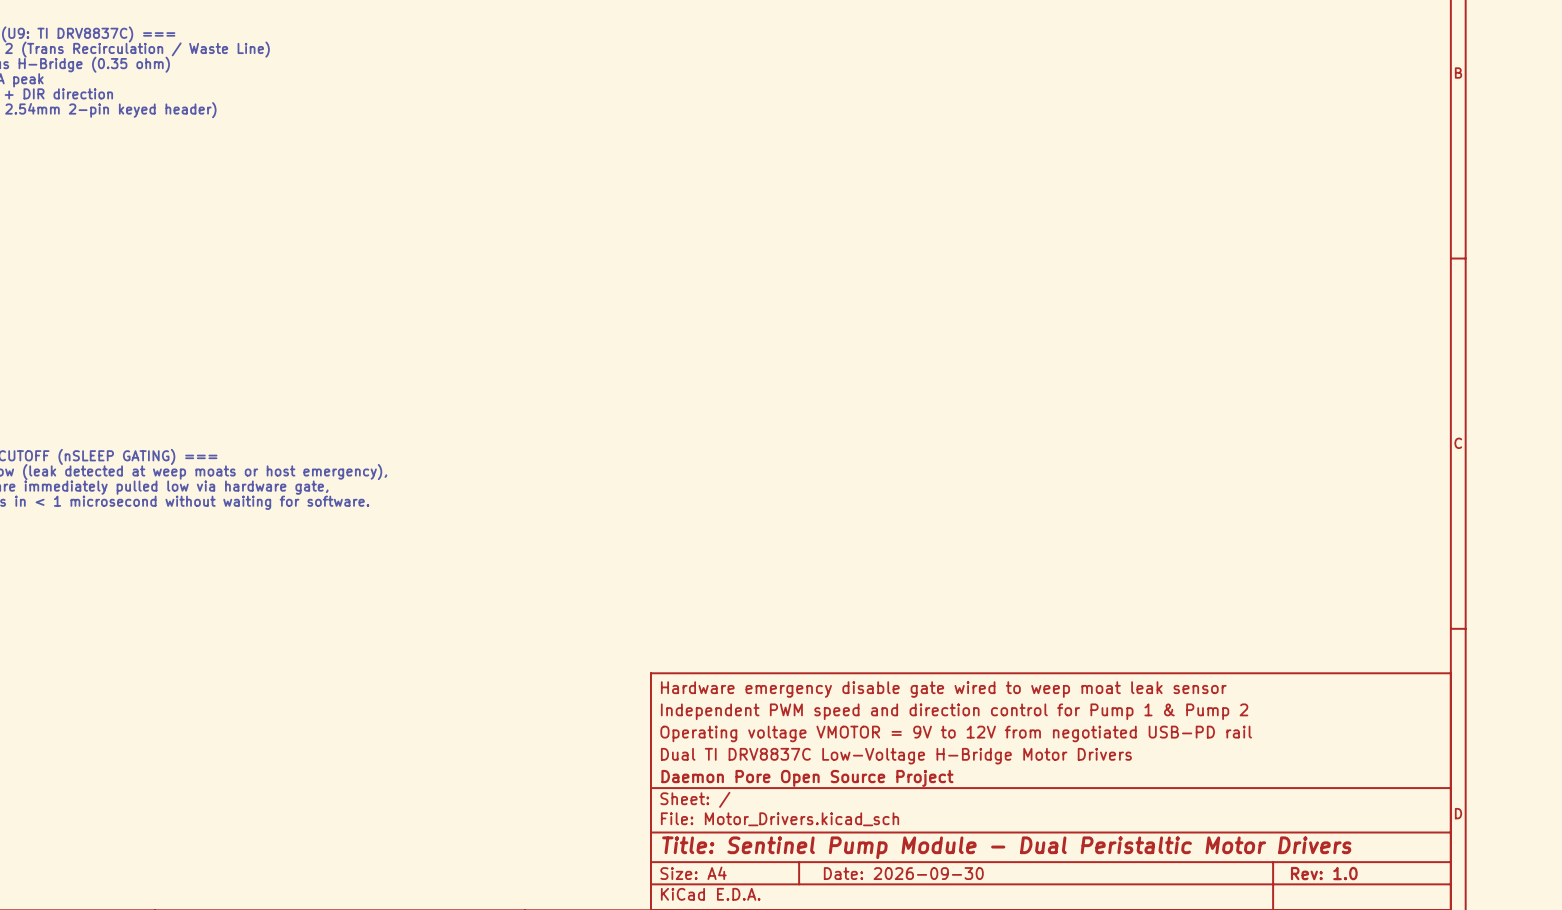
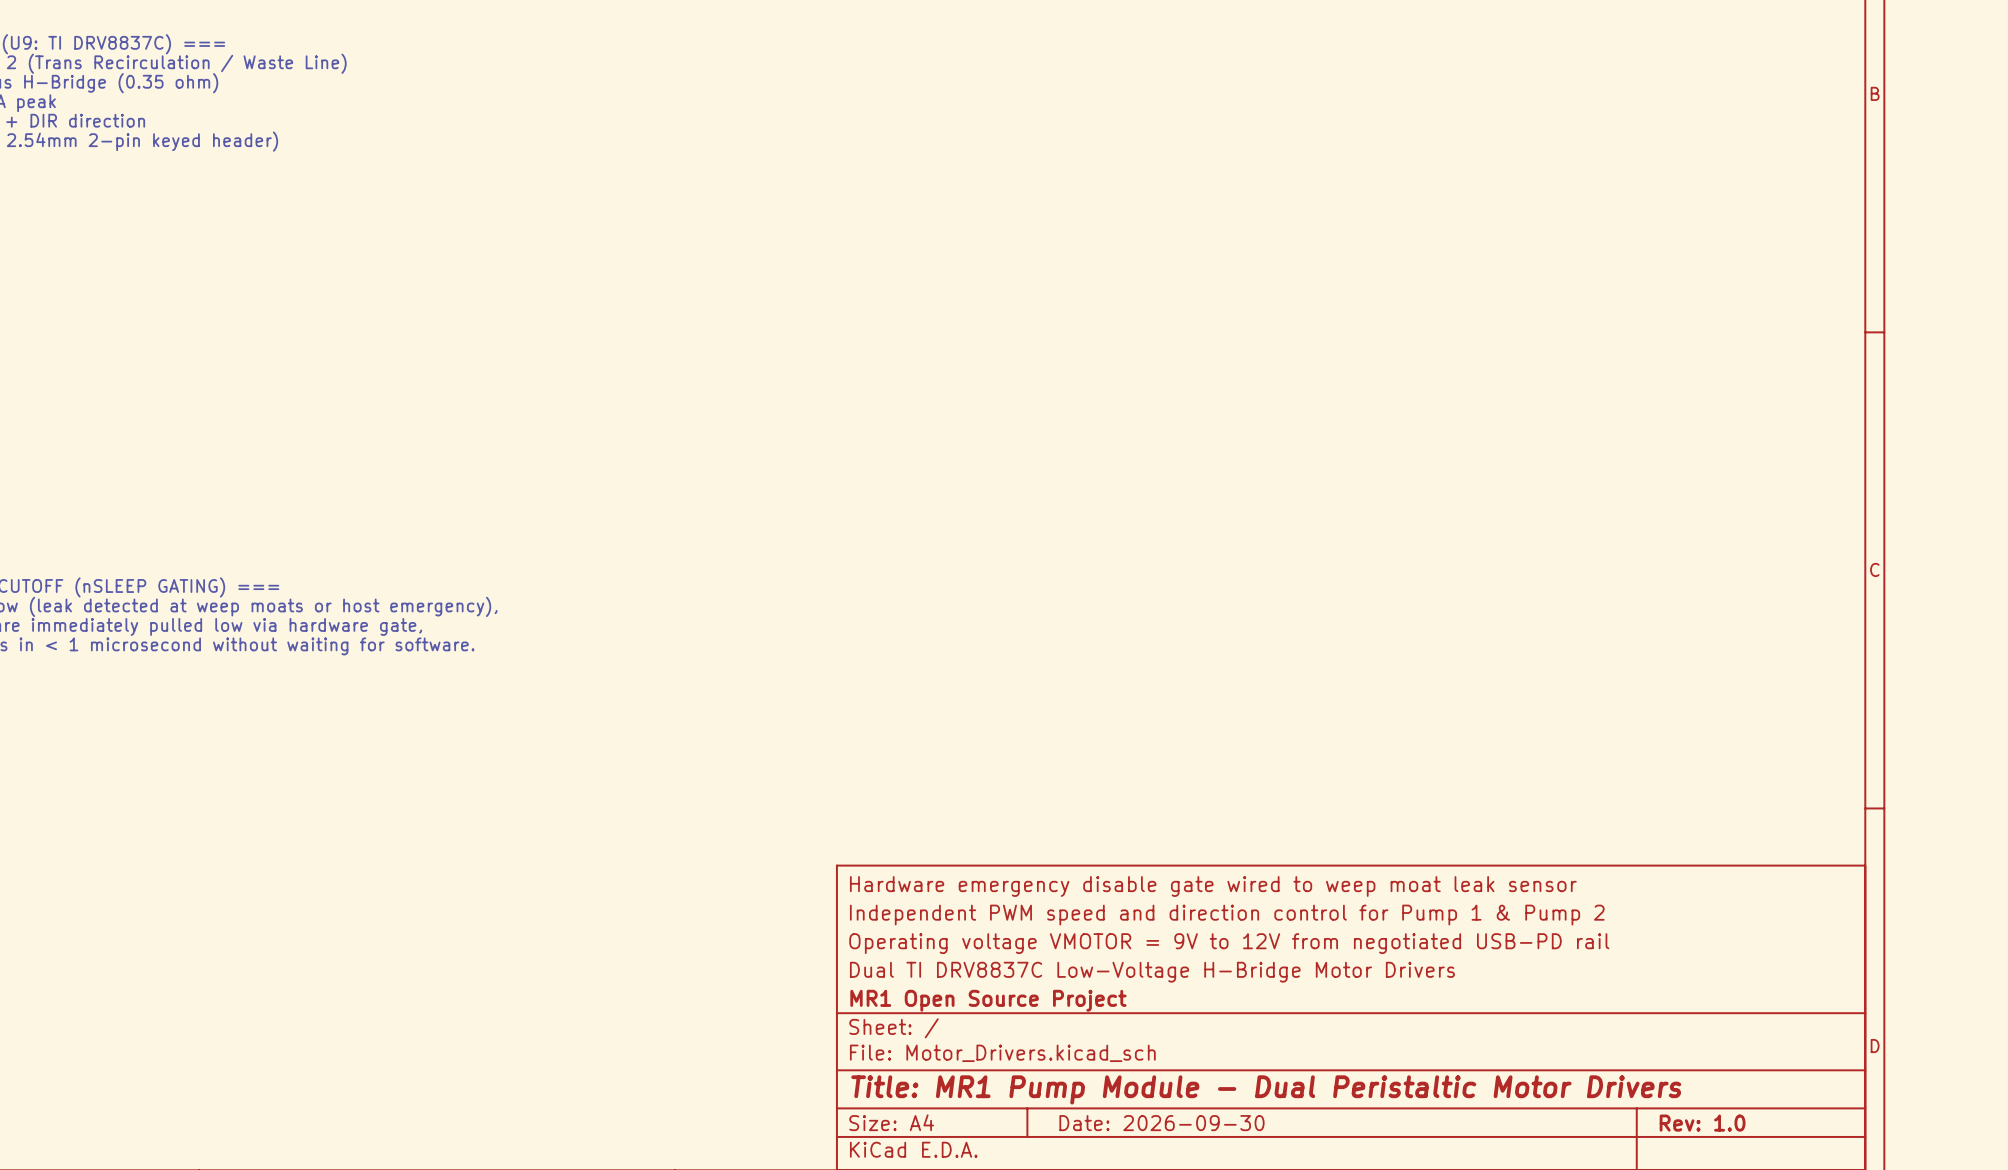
title block: Daemon Pore Open Source Project (807, 778) -> MR1 Open Source Project (988, 1000)
title block: Title: Sentinel Pump Module - Dual Peristaltic Motor Drivers (1006, 847) -> Title: MR1 Pump Module - Dual Peristaltic Motor Drivers (1266, 1089)

